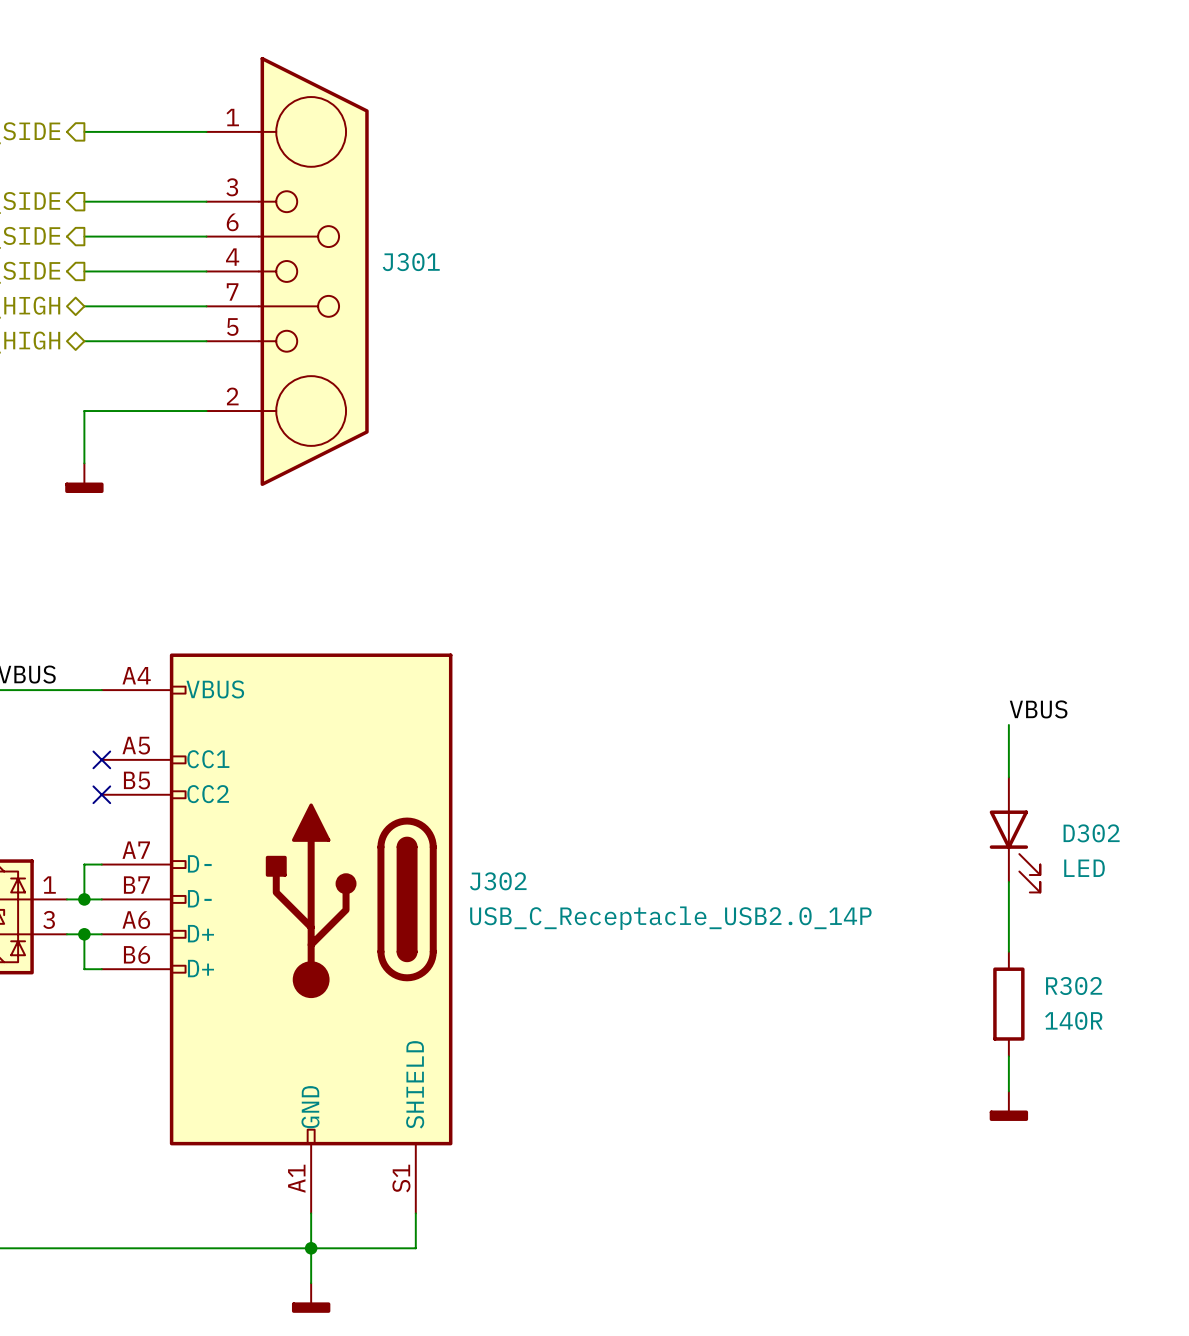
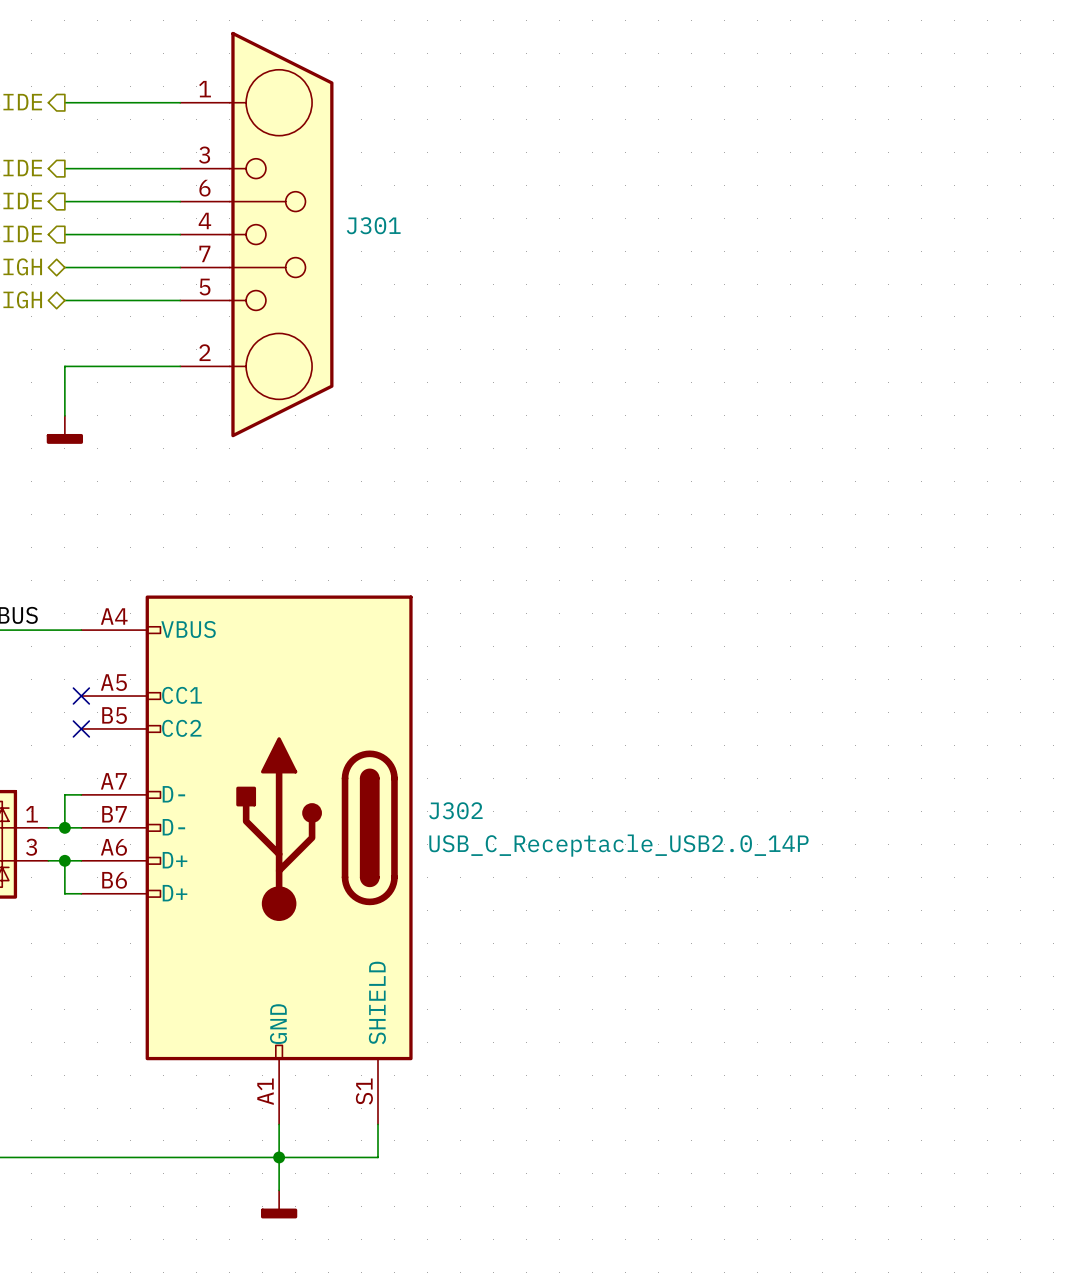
label: VBUS (1038, 709) -> none
wire: (1008, 724) (1008, 777) -> none
D302: LED (1014, 834) -> none
wire: (1008, 881) (1008, 951) -> none
R302: 140R (1008, 1004) -> none
wire: (1008, 1056) (1008, 1091) -> none
power symbol: (1008, 1106) -> none

